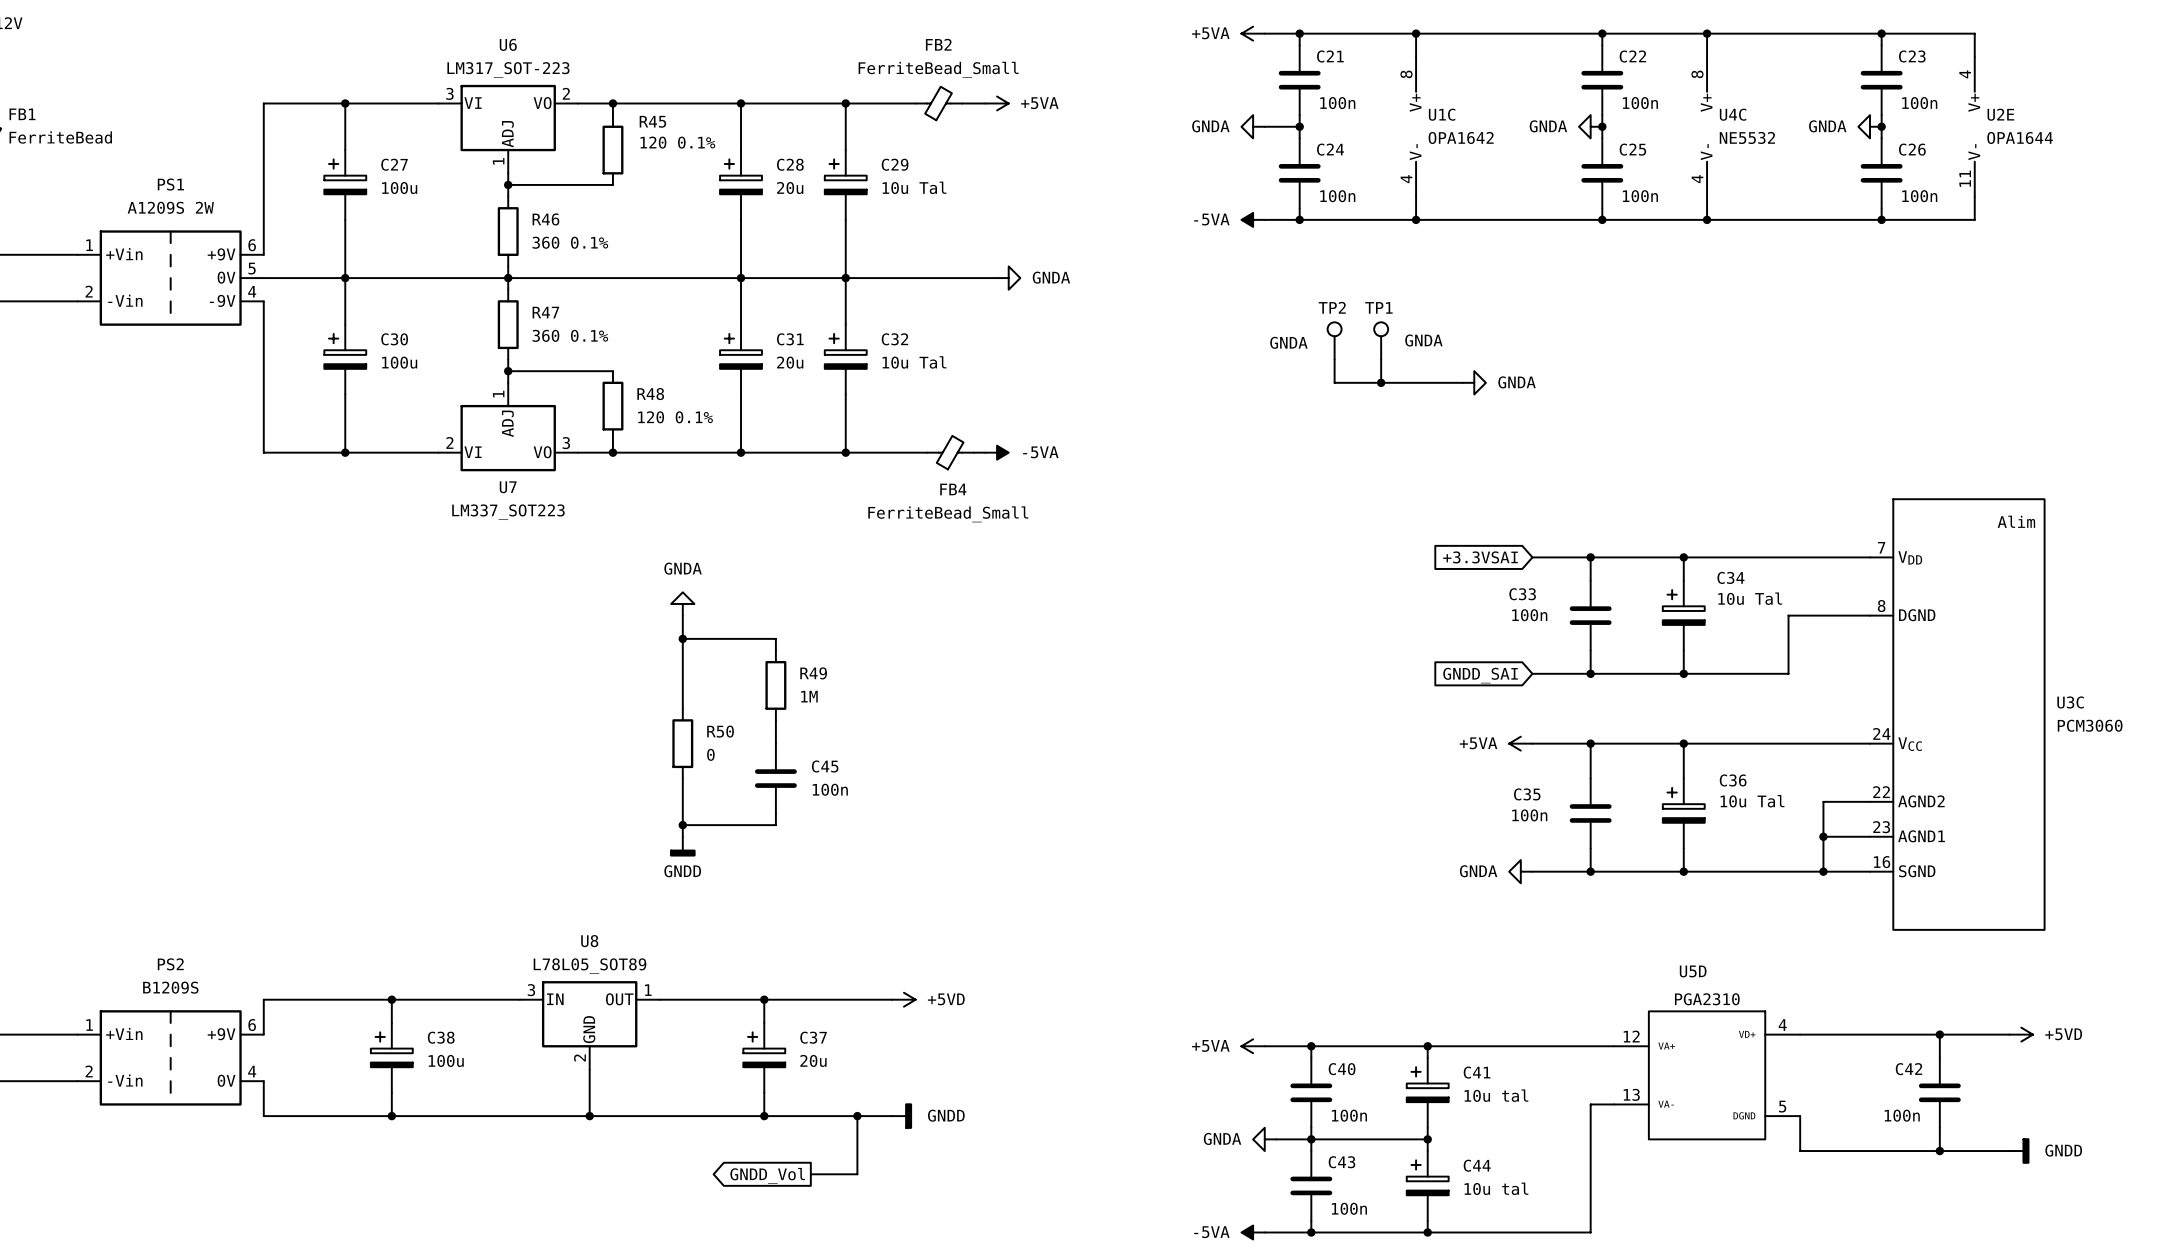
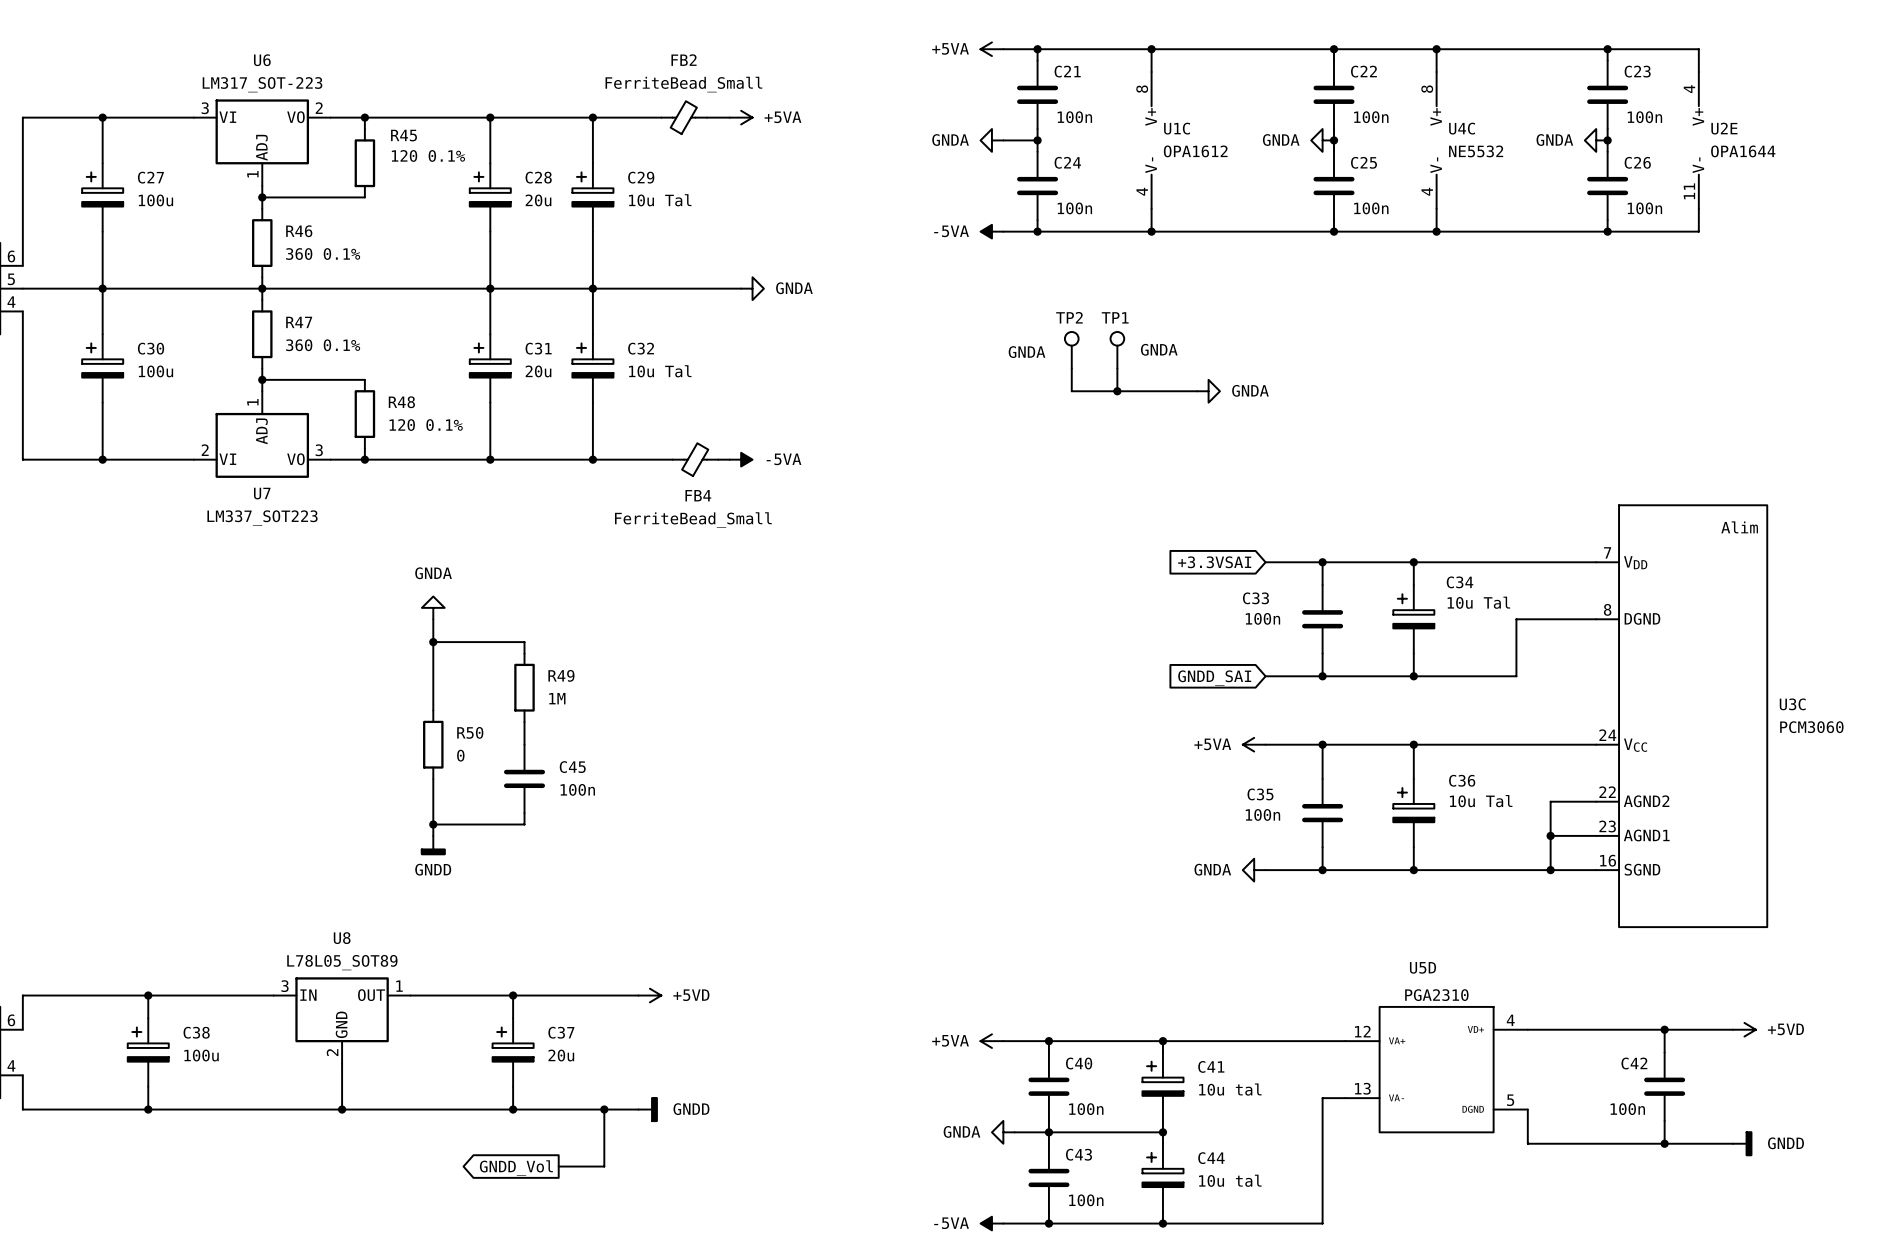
U1C value: OPA1642 (1461, 137) -> OPA1612 (1195, 151)

